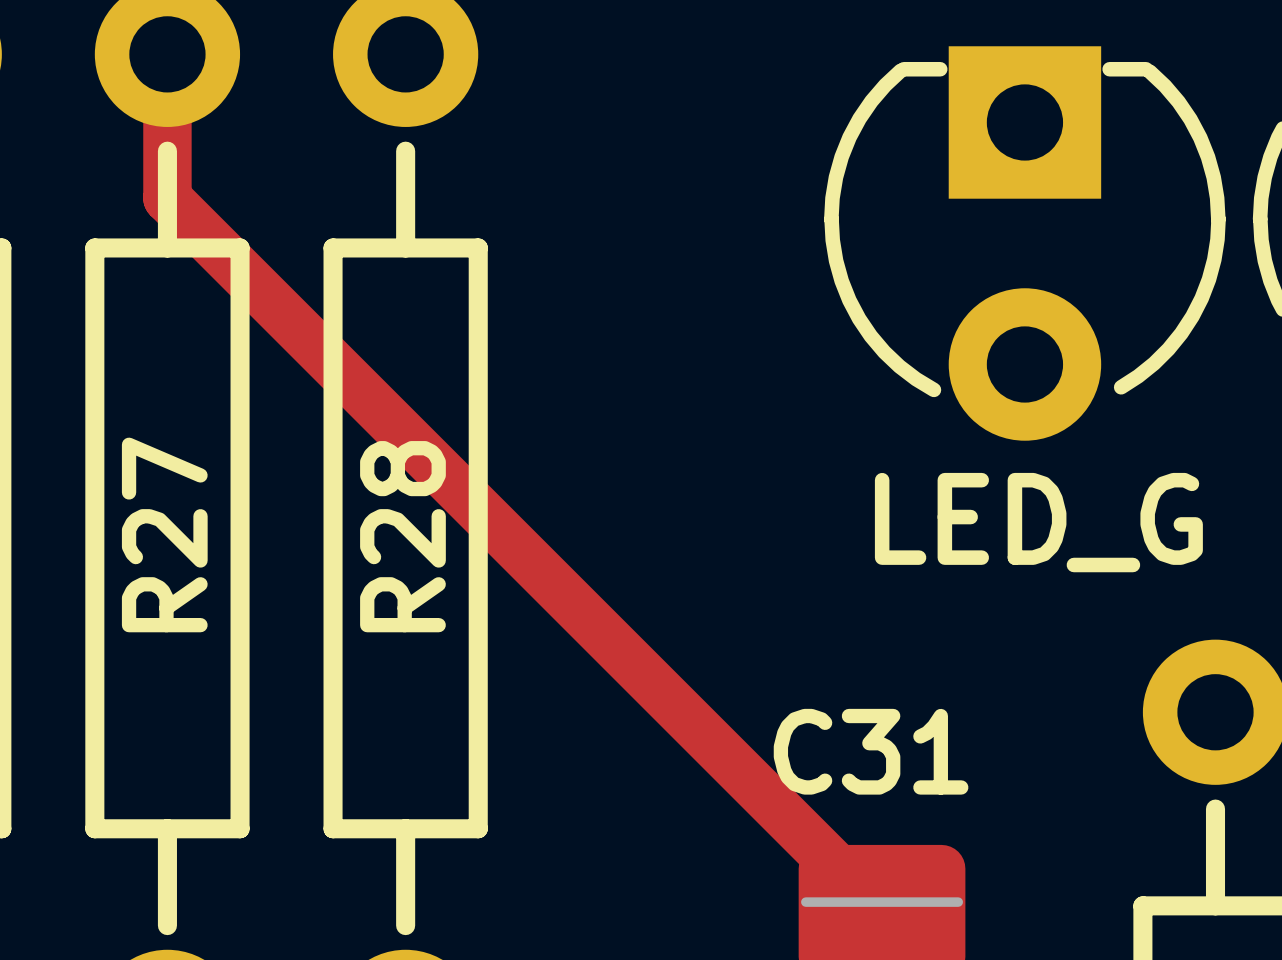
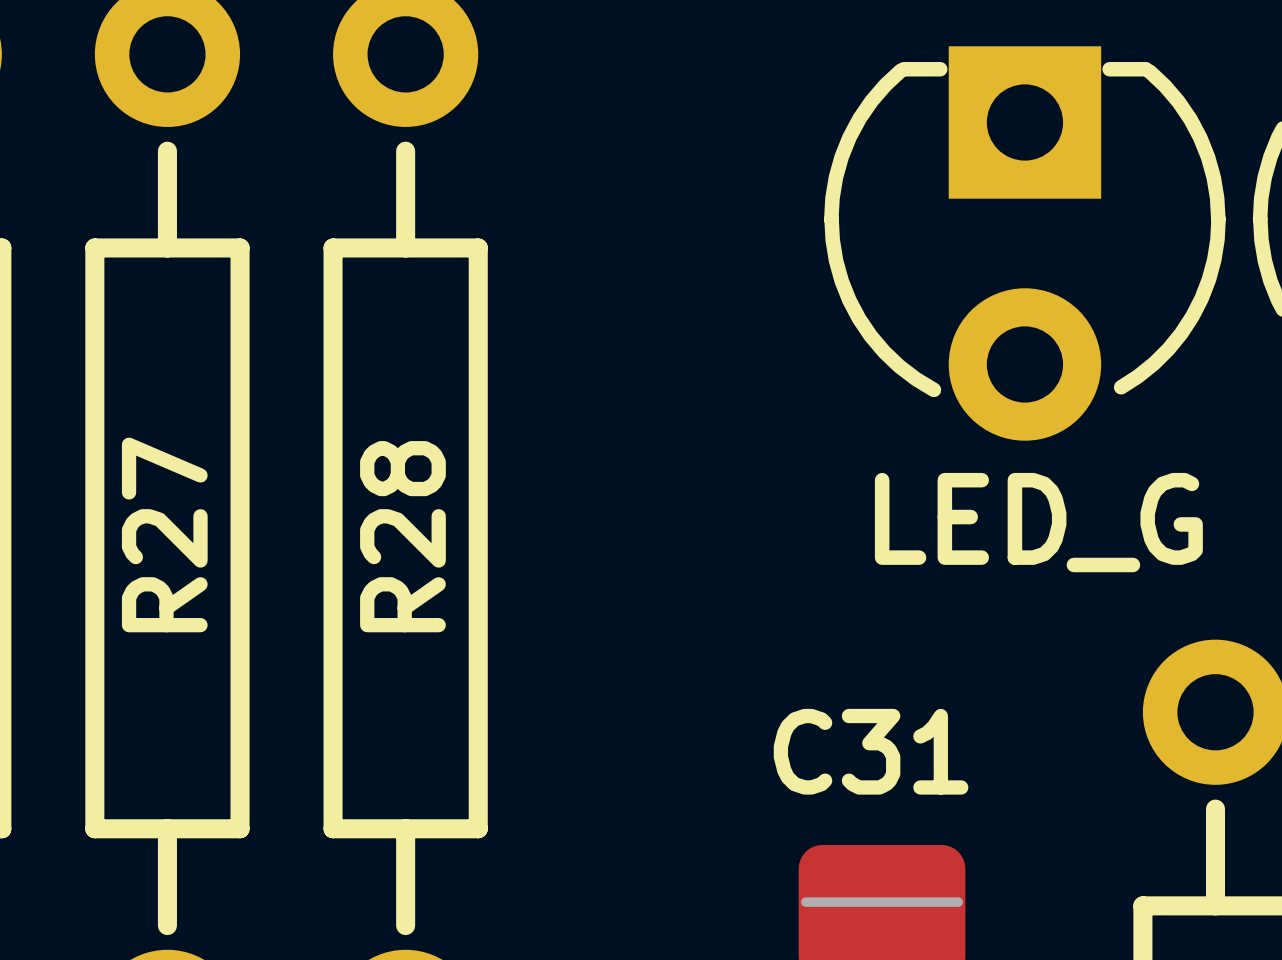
track: (167, 54) (167, 198) (882, 912) -> none

